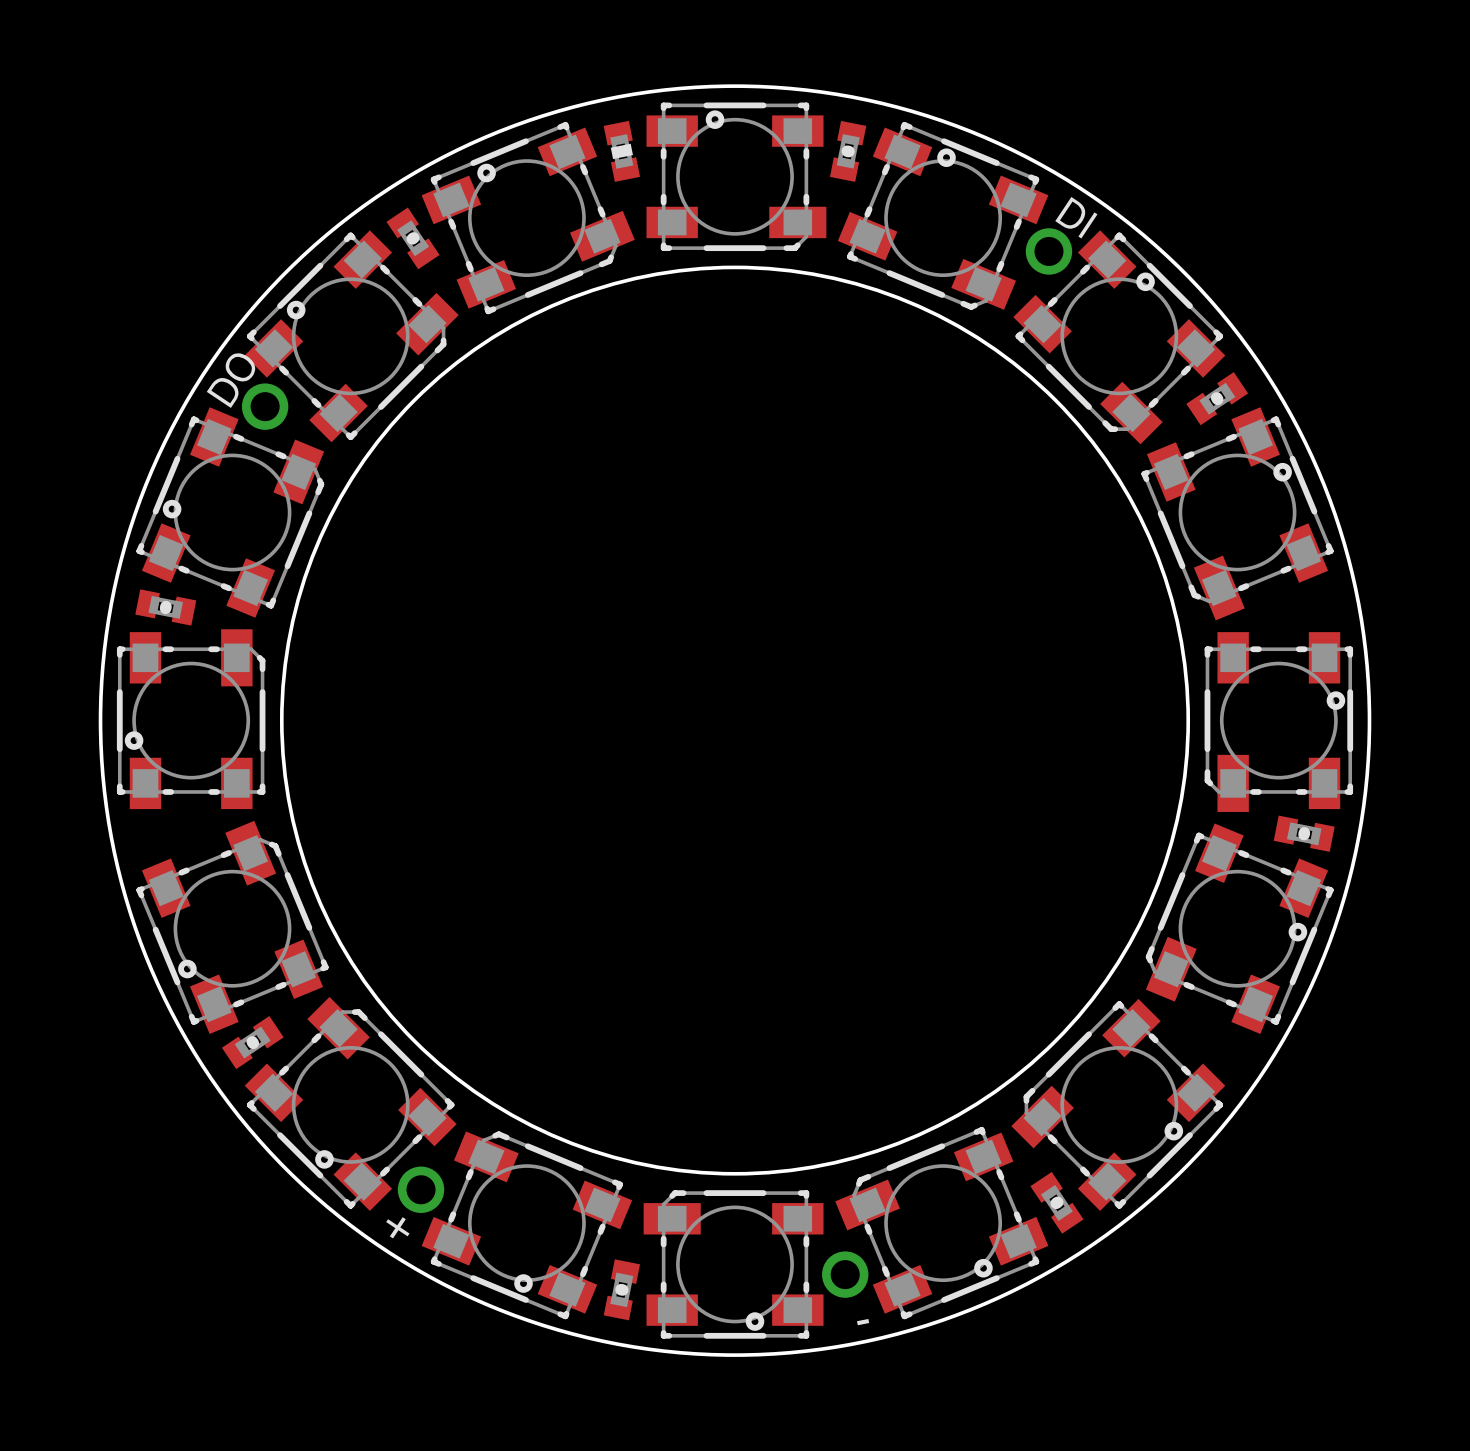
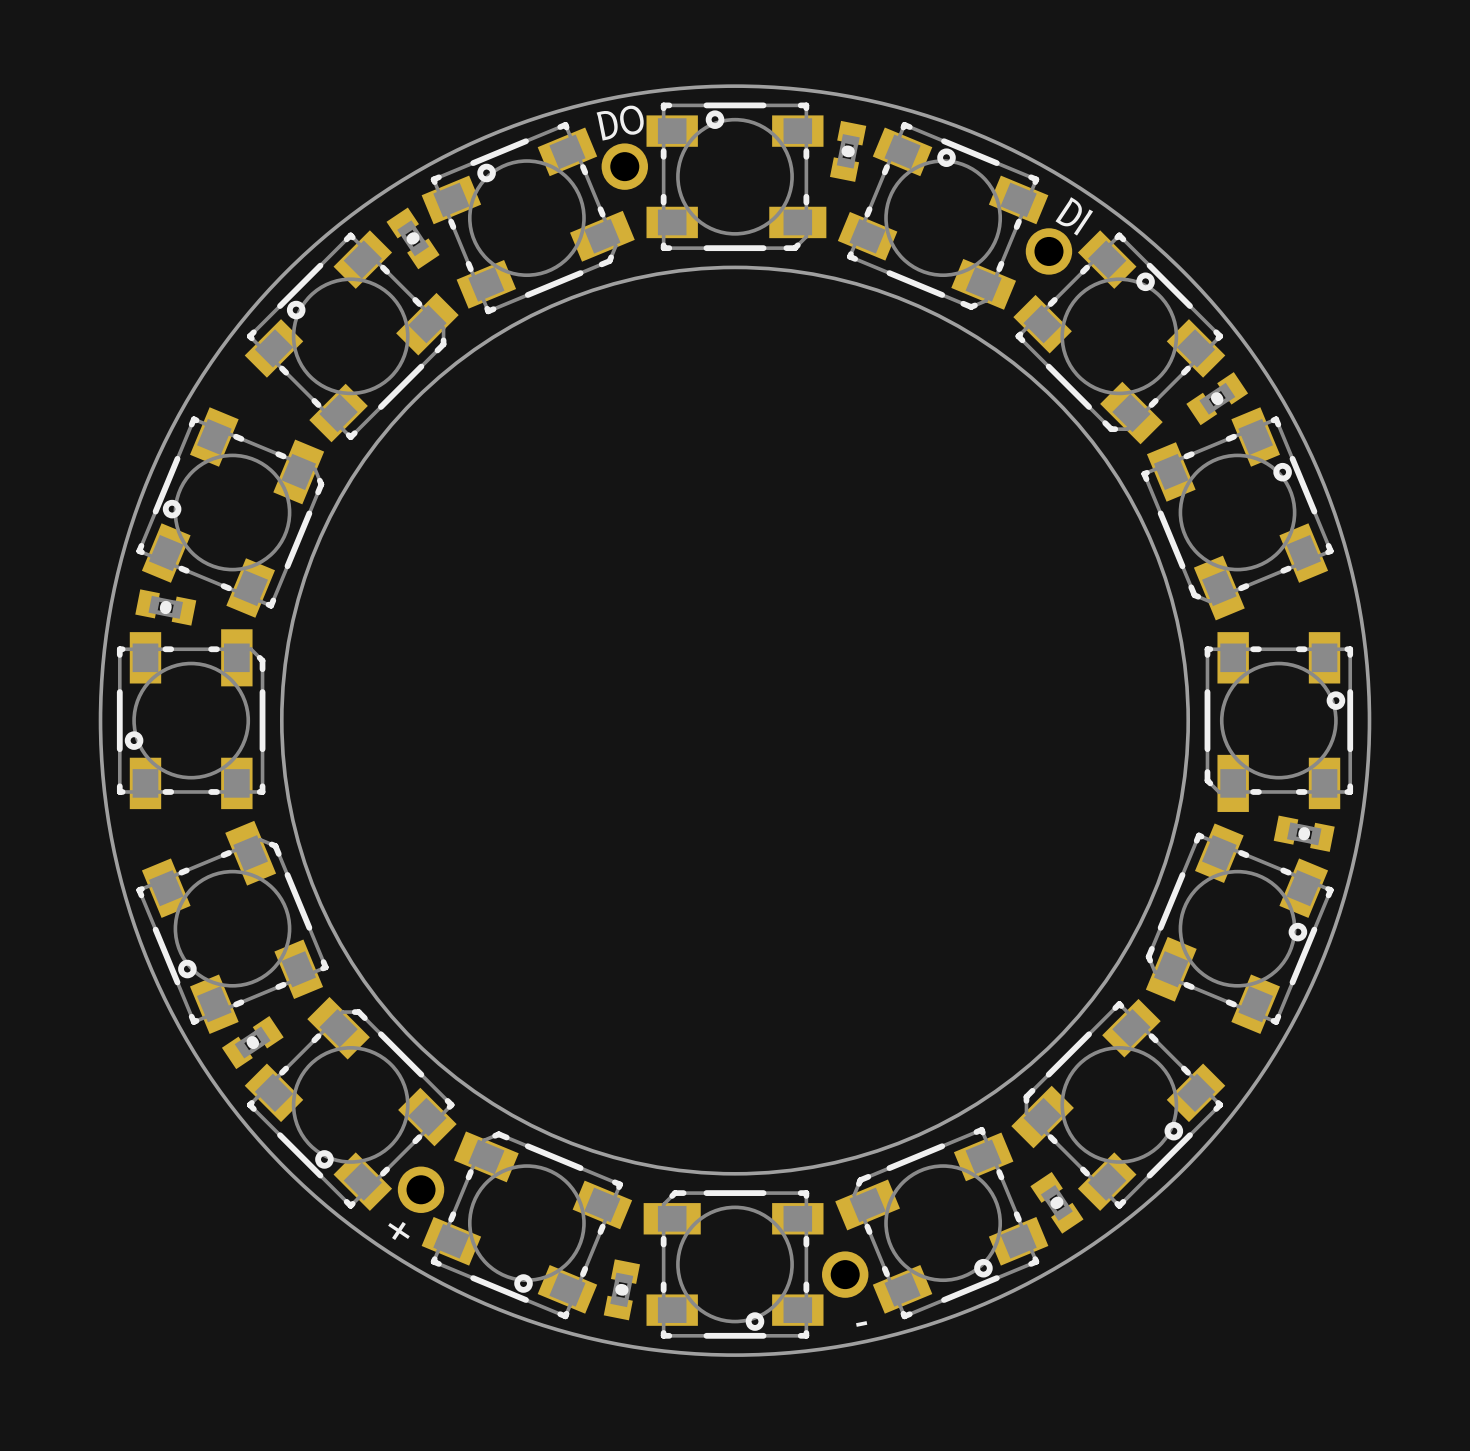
part: (621, 151) -> none
DO name rotation: 0° (231, 380) -> 45° clockwise (620, 122)
DO position: (265, 406) -> (624, 166)

